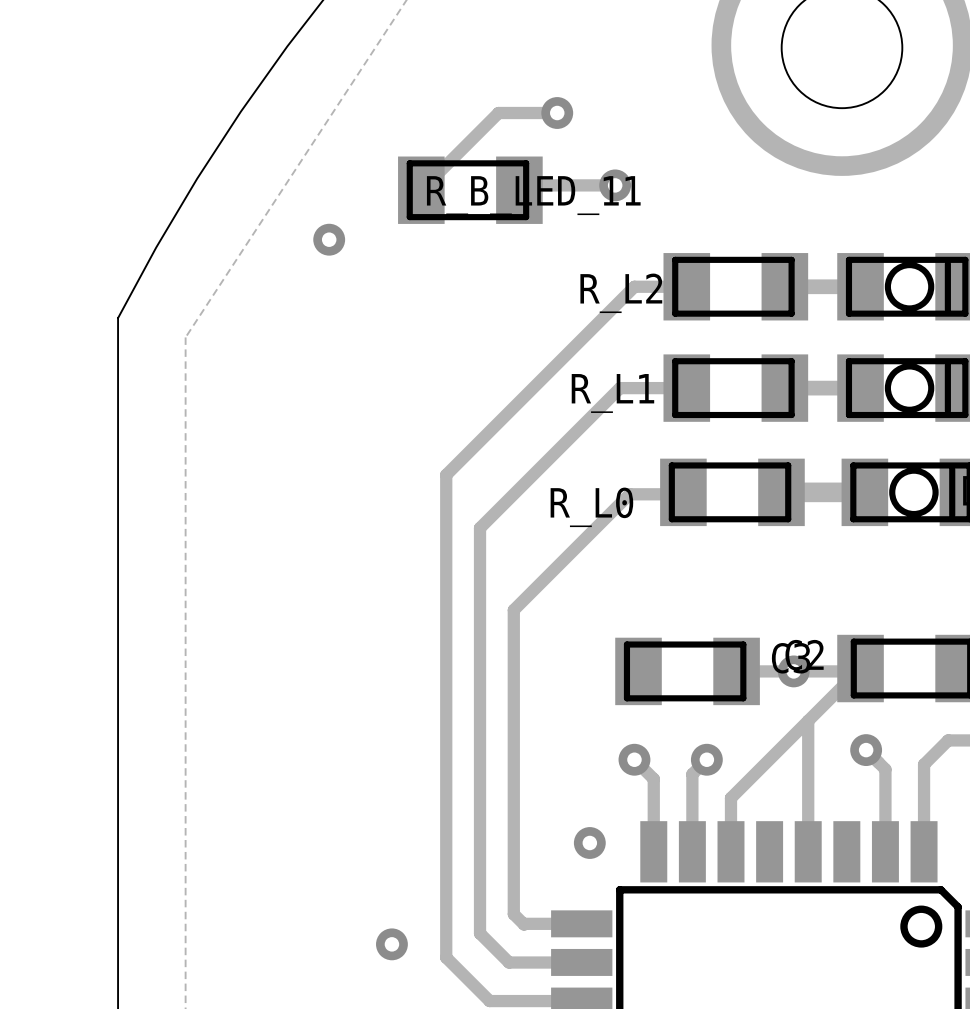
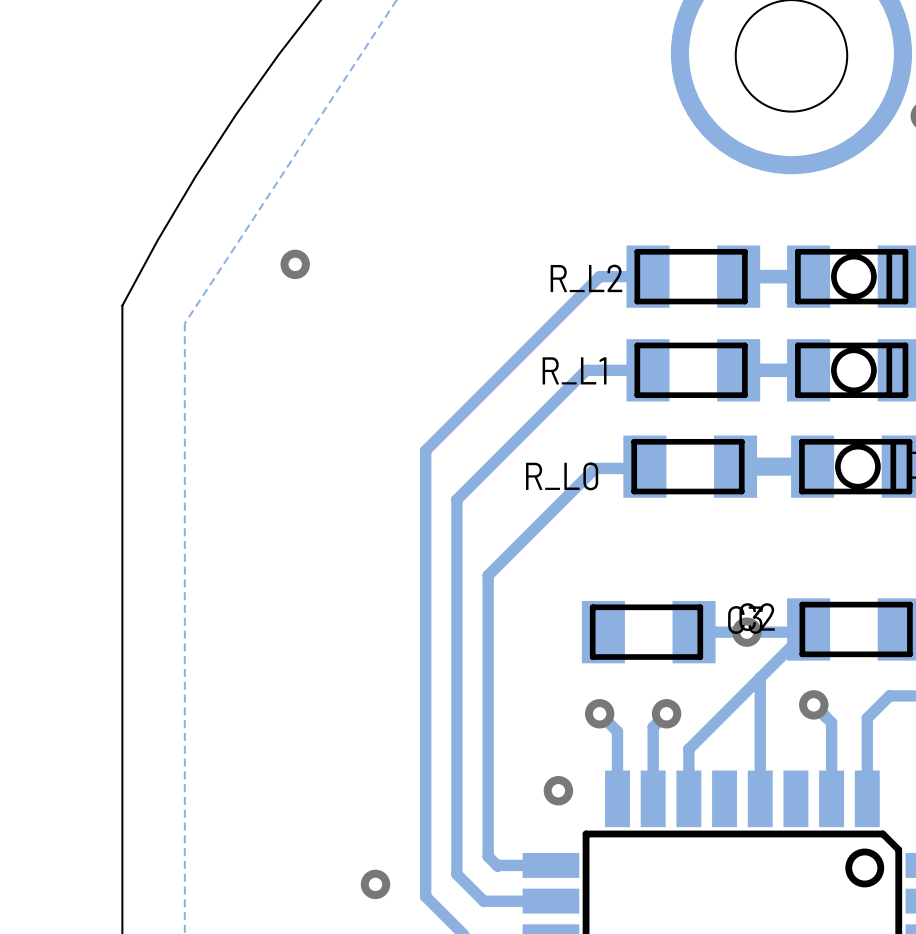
track: (557, 113) (498, 113) (421, 190) -> none
via: (557, 113) -> none
track: (615, 185) (524, 185) (519, 190) -> none
via: (615, 185) -> none
R_B_LED_11: (470, 190) -> none
via position: (329, 239) -> (295, 264)

